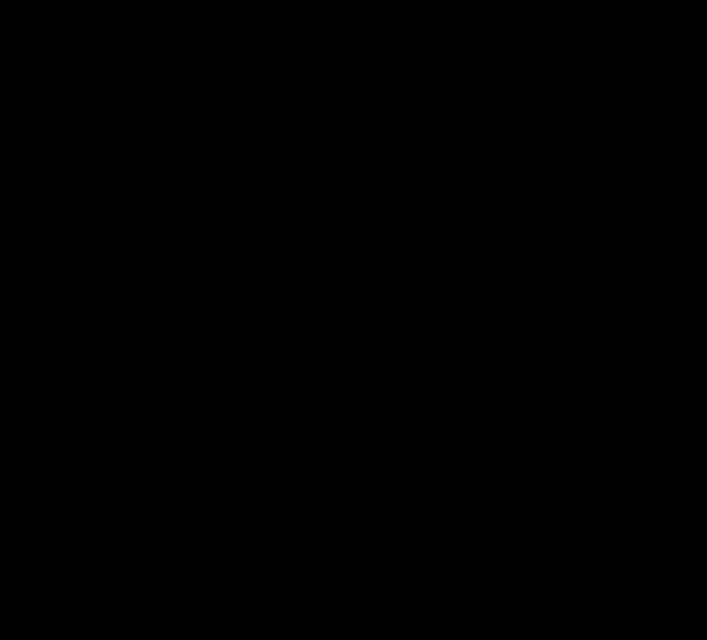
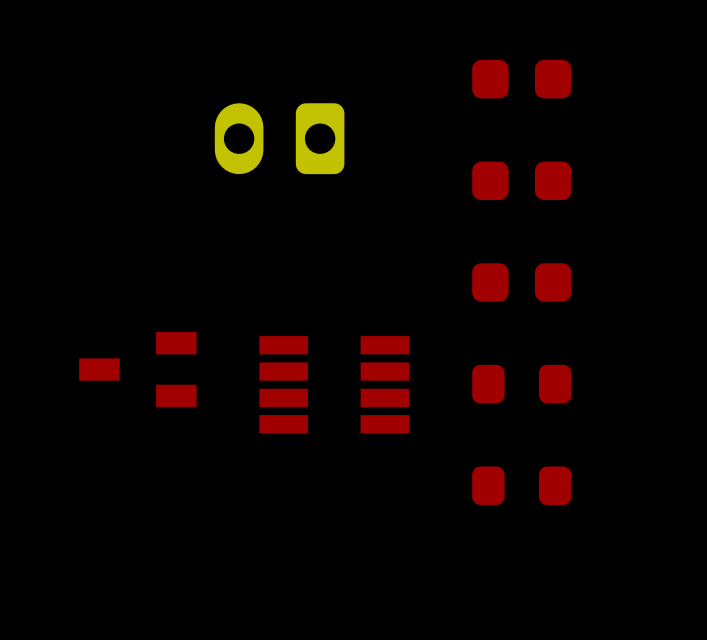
part: none -> (521, 79)
part: none -> (279, 138)
part: none -> (521, 180)
part: none -> (521, 282)
part: none -> (137, 369)
part: none -> (334, 384)
part: none -> (521, 384)
part: none -> (521, 485)

